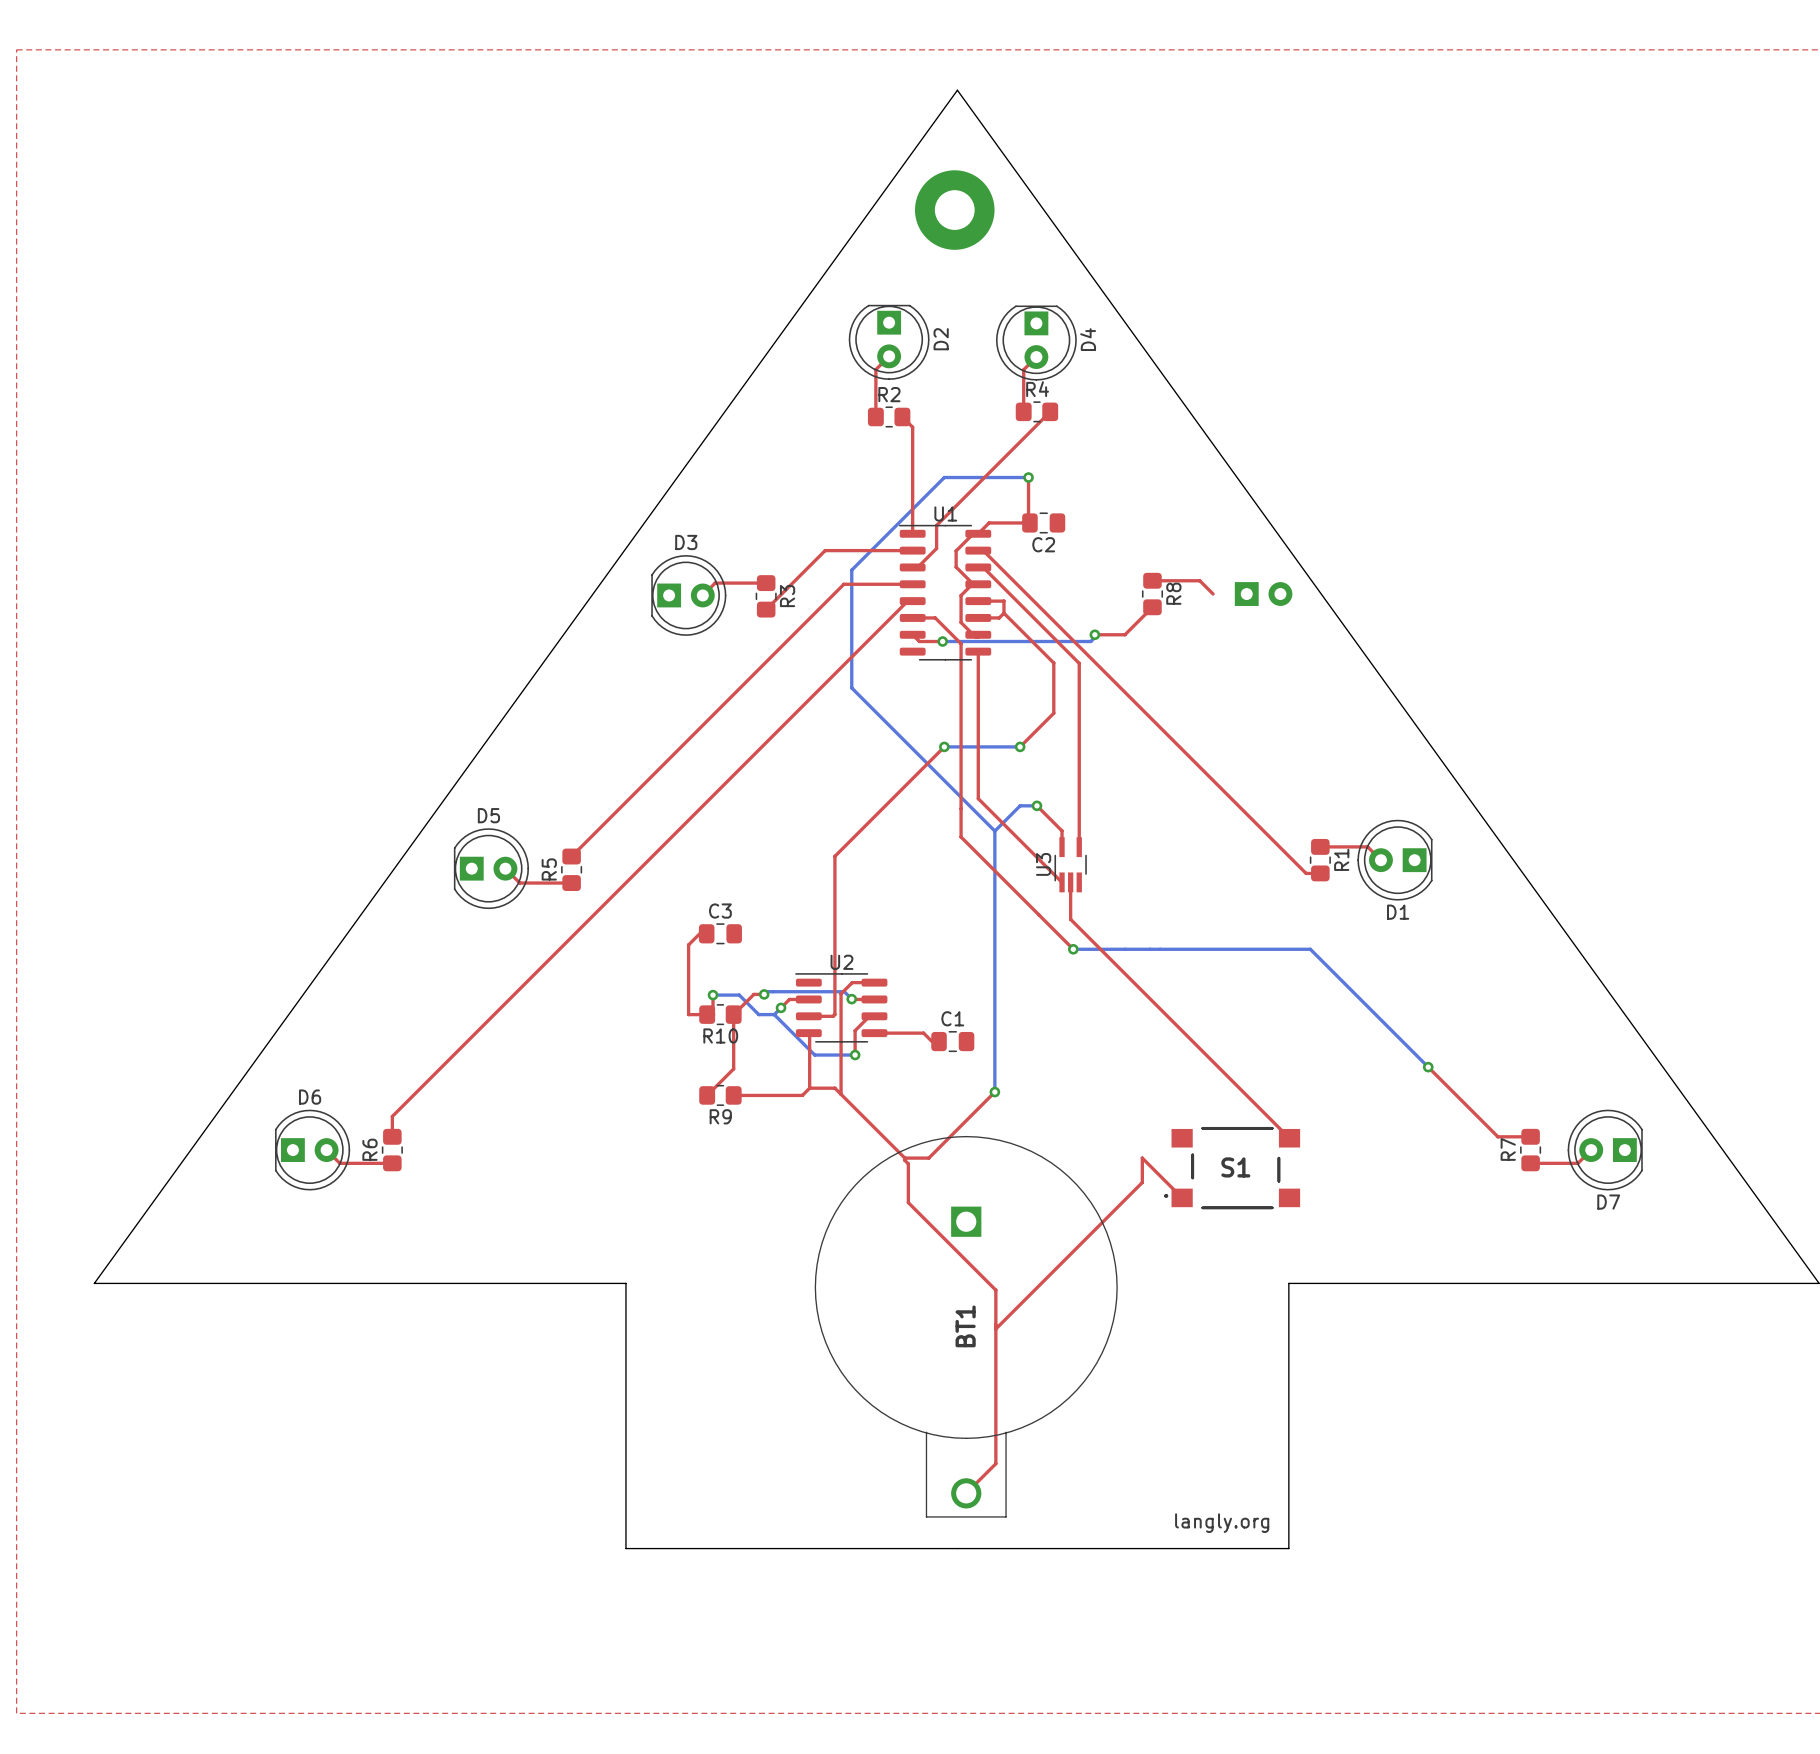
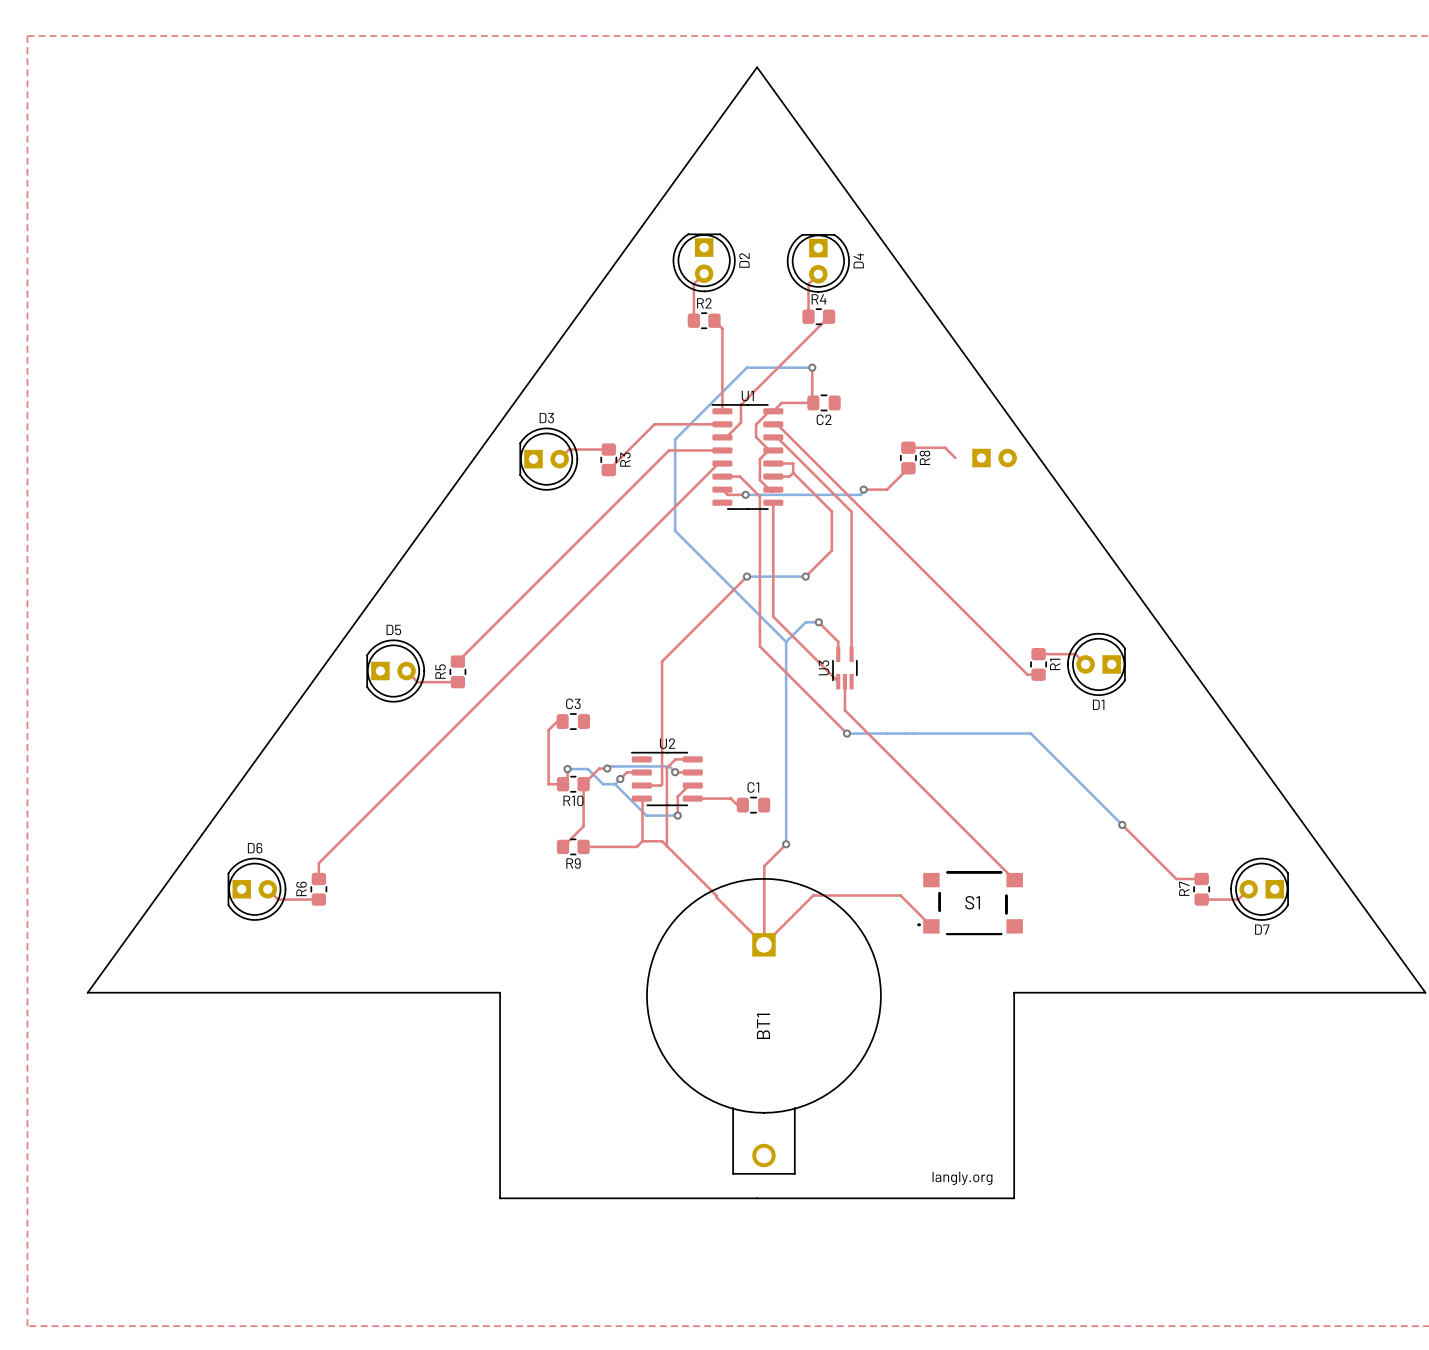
part: (954, 210) -> none
top track: (966, 1120) (928, 1158) (904, 1158) -> (764, 866) (764, 944)
top track: (1142, 1158) (1142, 1182) (995, 1328) -> (900, 895) (813, 895) (763, 944) (719, 899)
top track: (908, 1163) (908, 1202) (995, 1290) (995, 1463) (966, 1493) -> none

